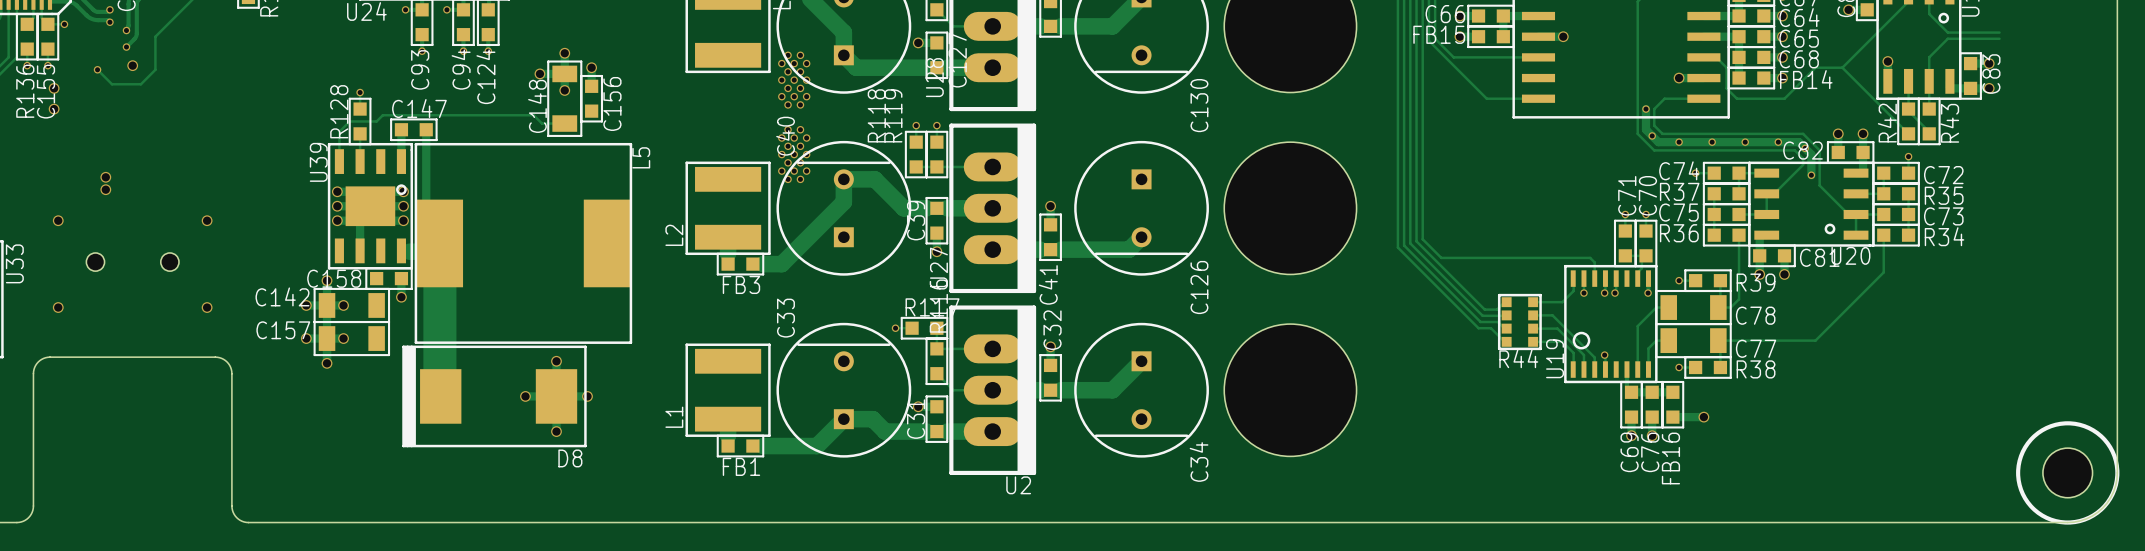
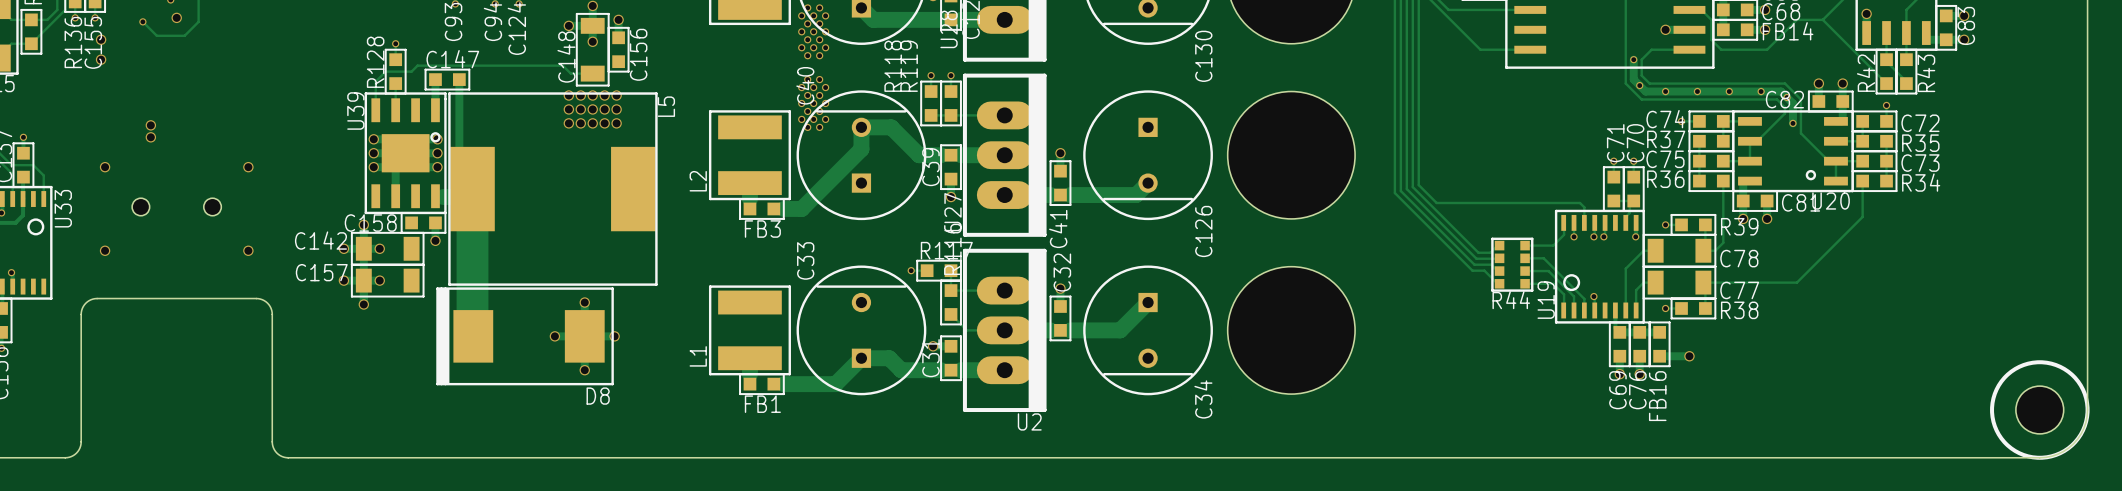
via: none -> (568, 95)
via: none -> (580, 95)
via: none -> (592, 95)
via: none -> (604, 95)
via: none -> (616, 95)
via: none -> (568, 109)
via: none -> (580, 109)
via: none -> (592, 109)
via: none -> (604, 109)
via: none -> (616, 109)
via: none -> (568, 123)
via: none -> (580, 123)
via: none -> (592, 123)
via: none -> (604, 123)
via: none -> (616, 123)

